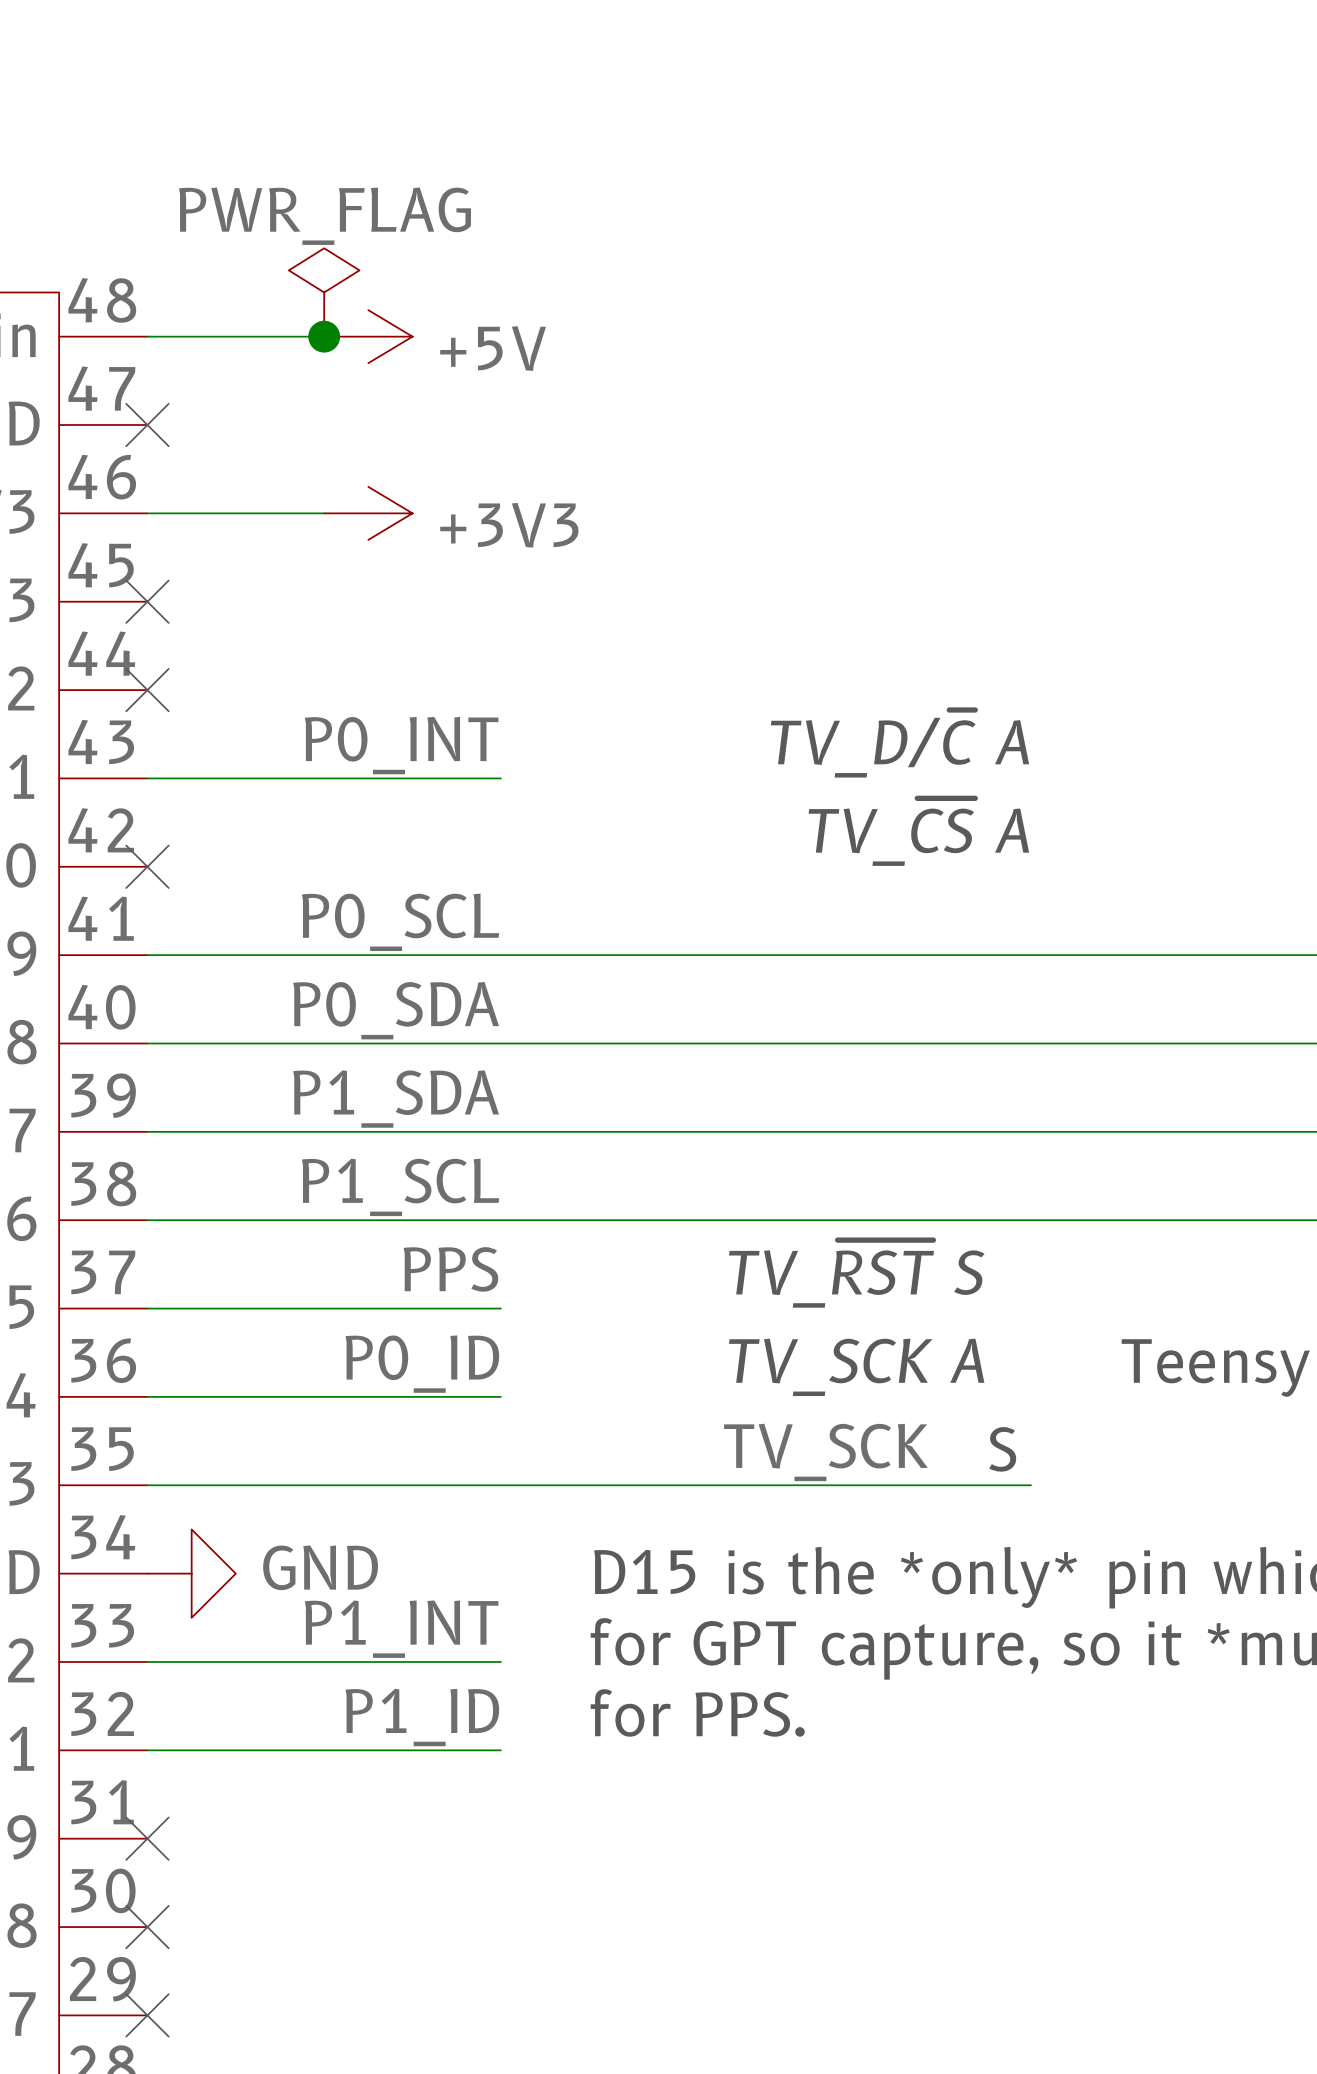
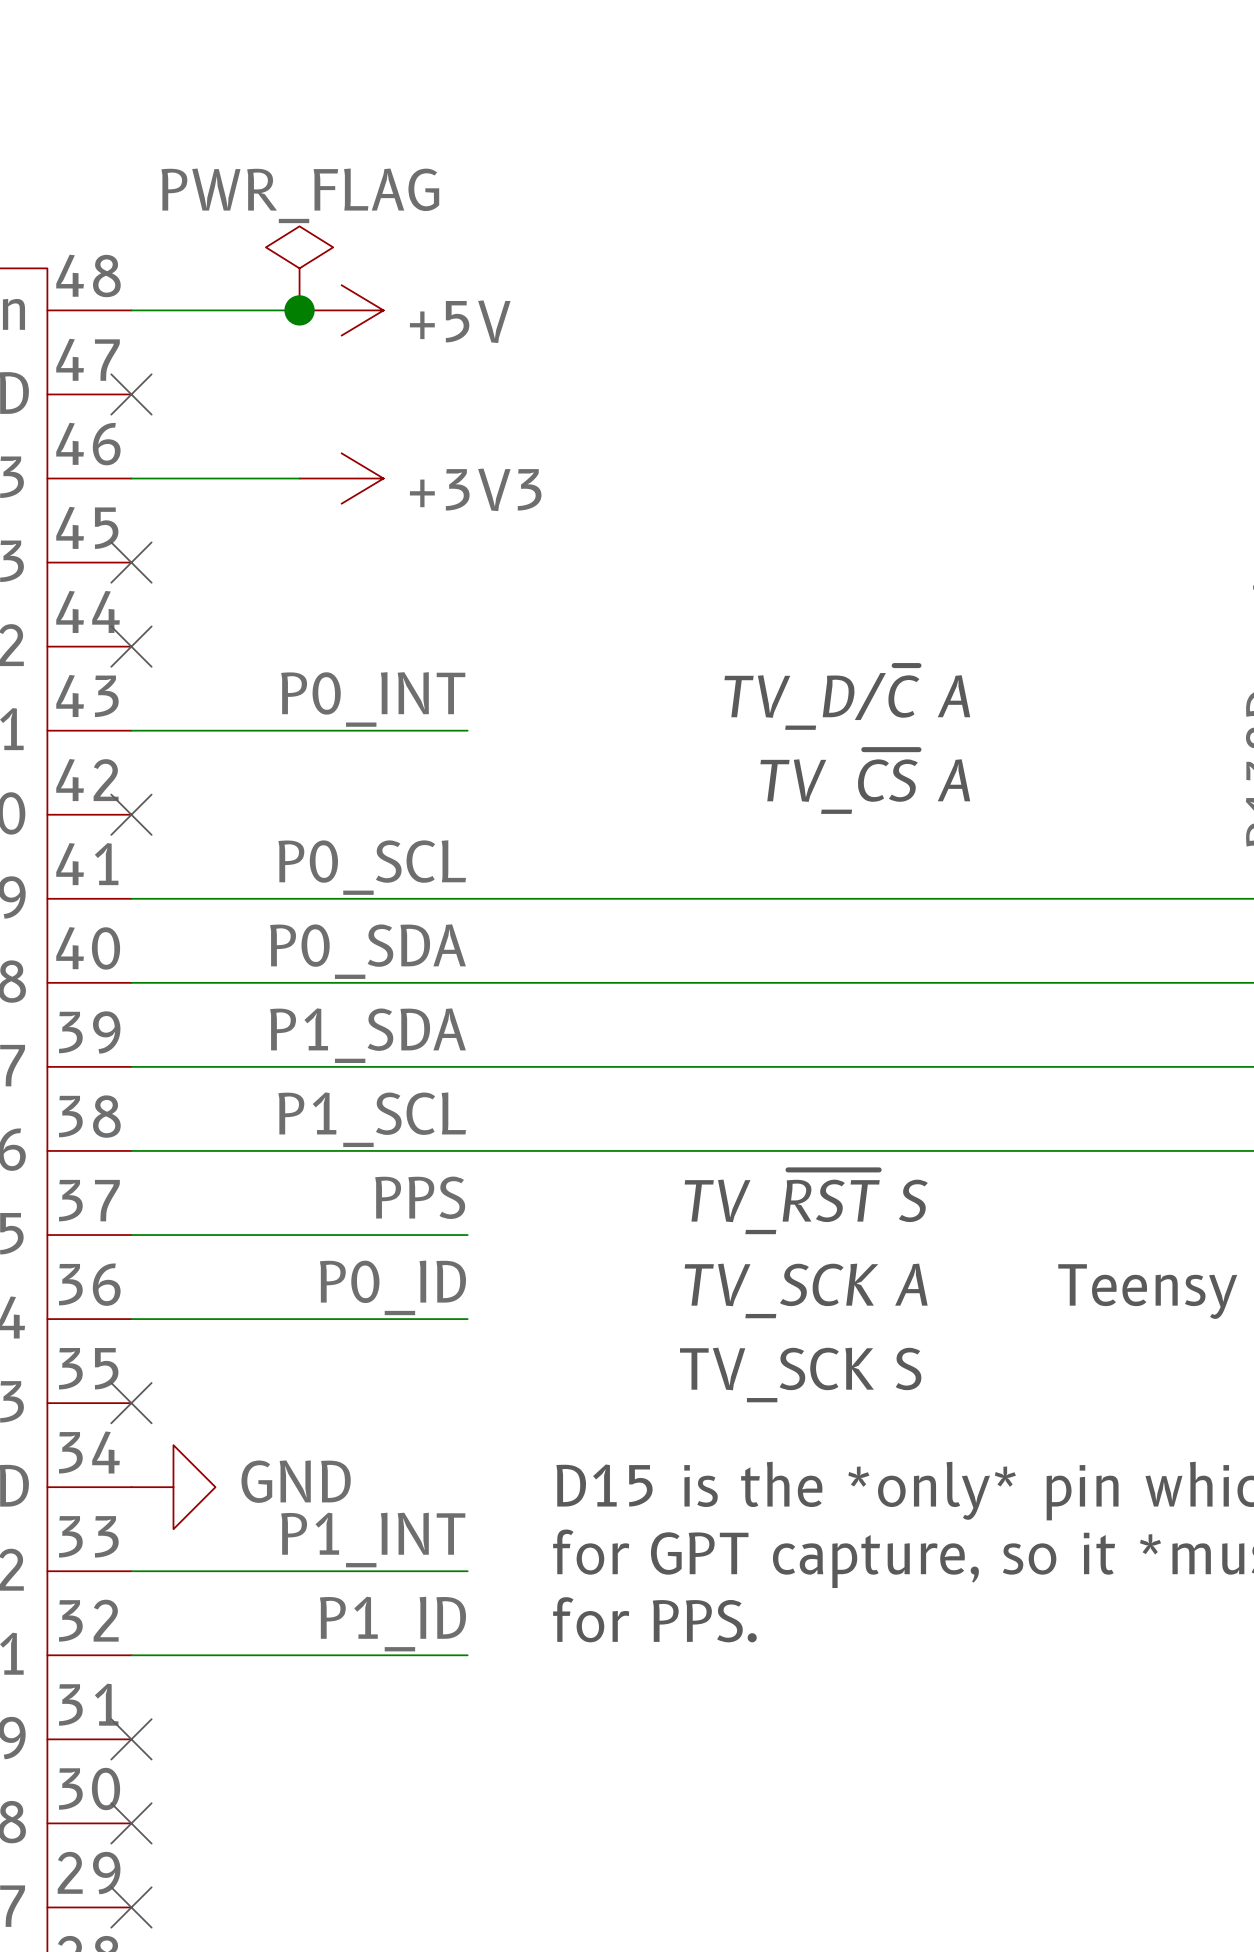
text: S (1002, 1449) -> none
label: TV_SCK (825, 1452) -> none
text: none -> TV_SCK S (800, 1374)
wire: (147, 1485) (1031, 1485) -> none
no-connect mark: none -> (131, 1403)

